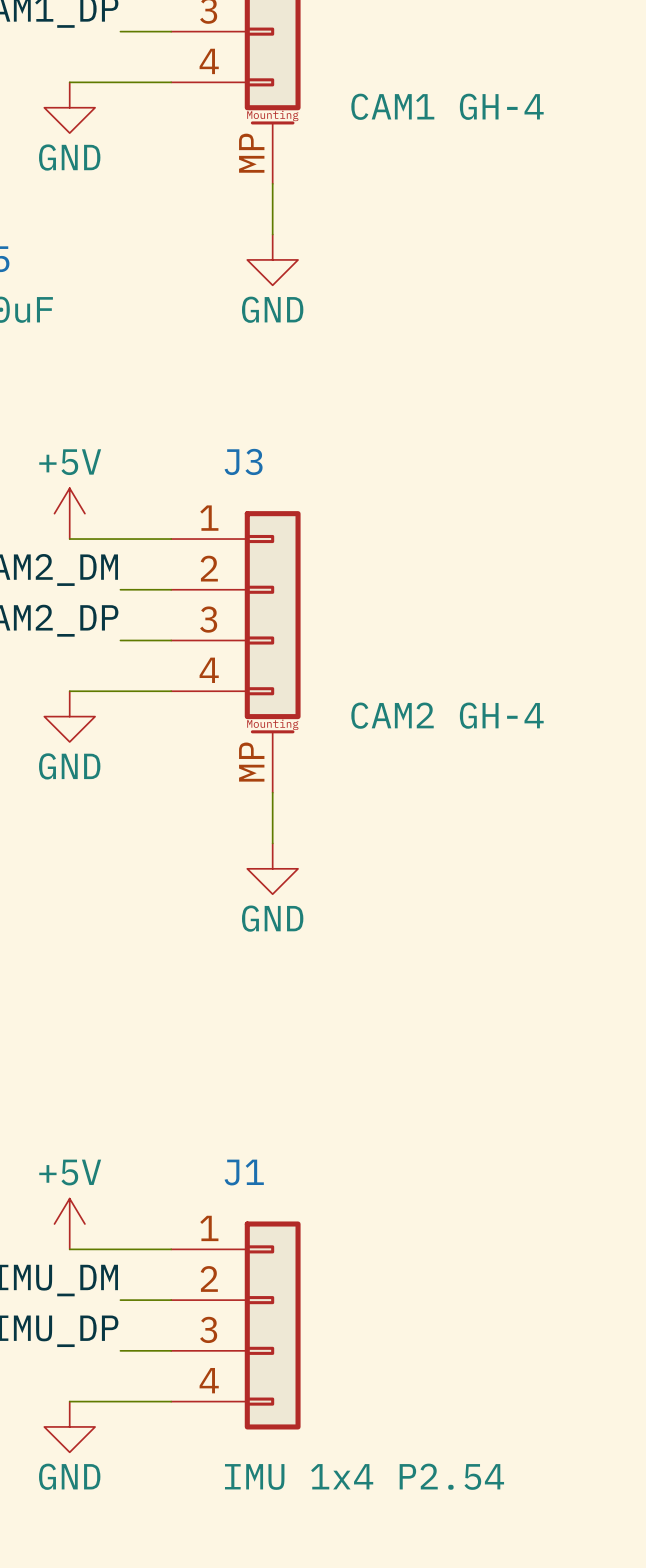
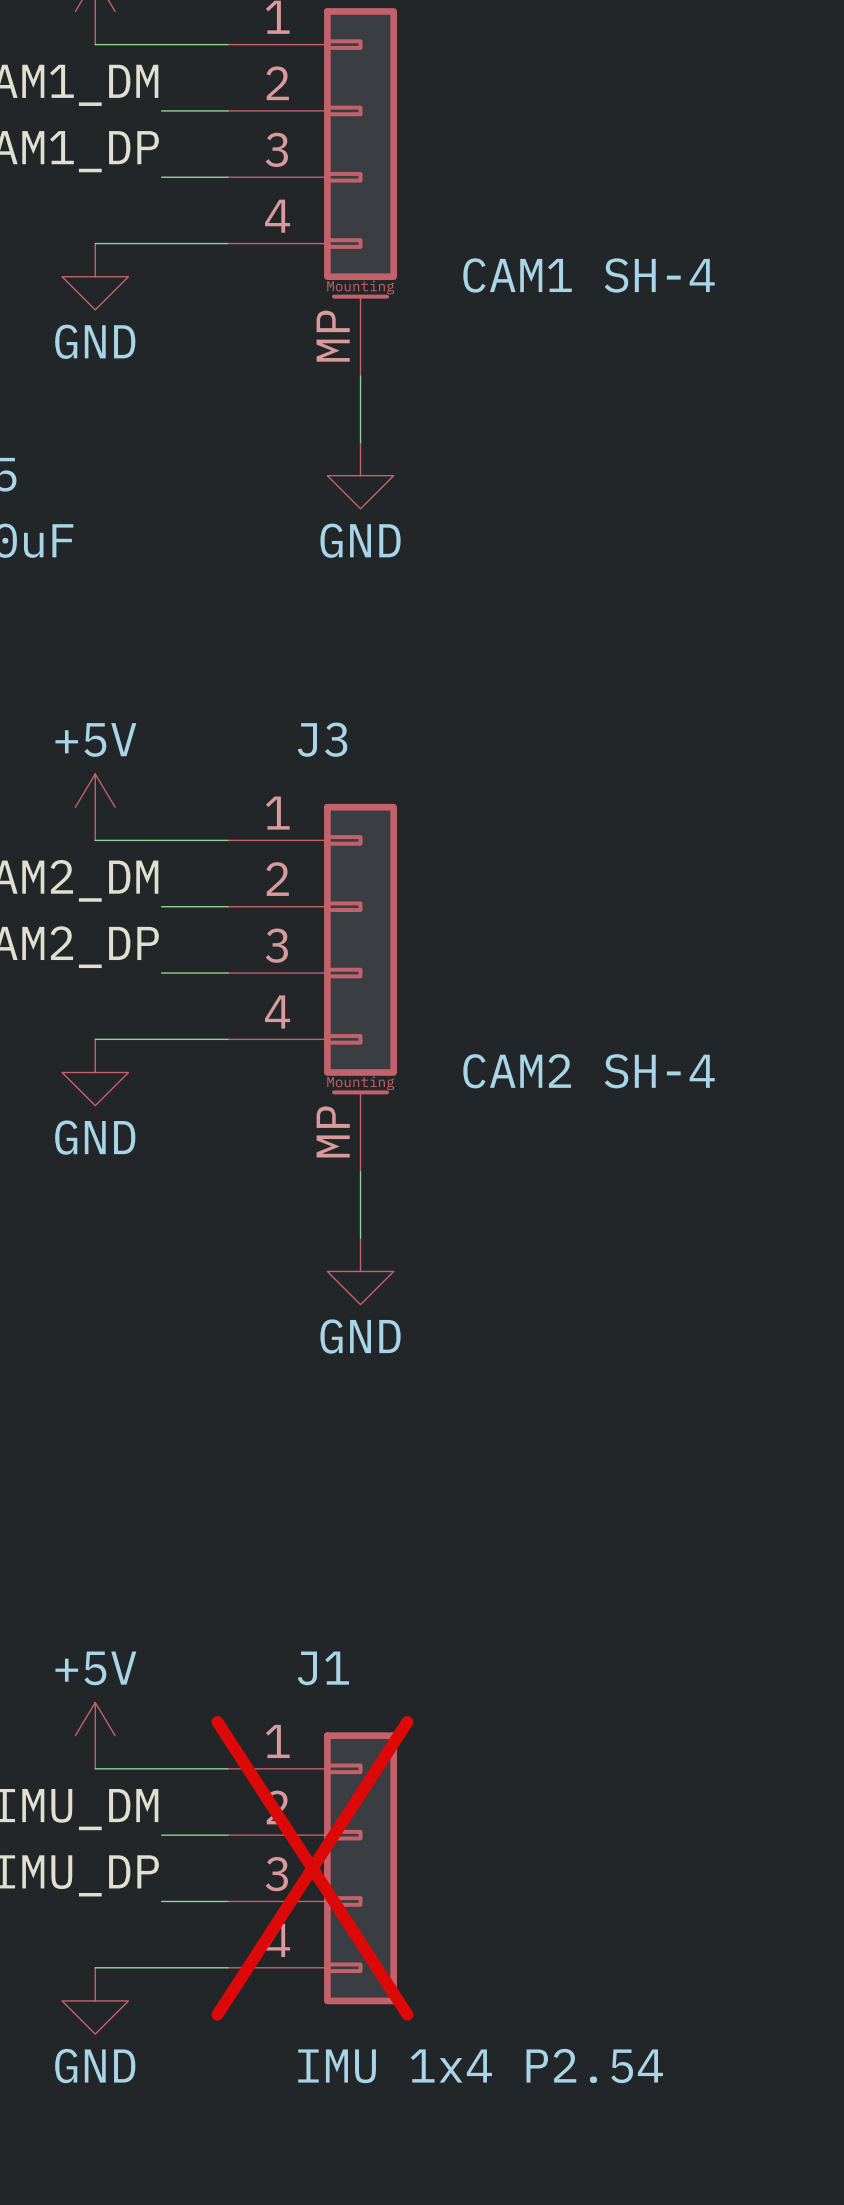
part value: CAM1 GH-4 (447, 106) -> CAM1 SH-4 (589, 275)
J3 value: CAM2 GH-4 (447, 715) -> CAM2 SH-4 (589, 1071)
J1 do-not-place cross: none -> (312, 1868)

